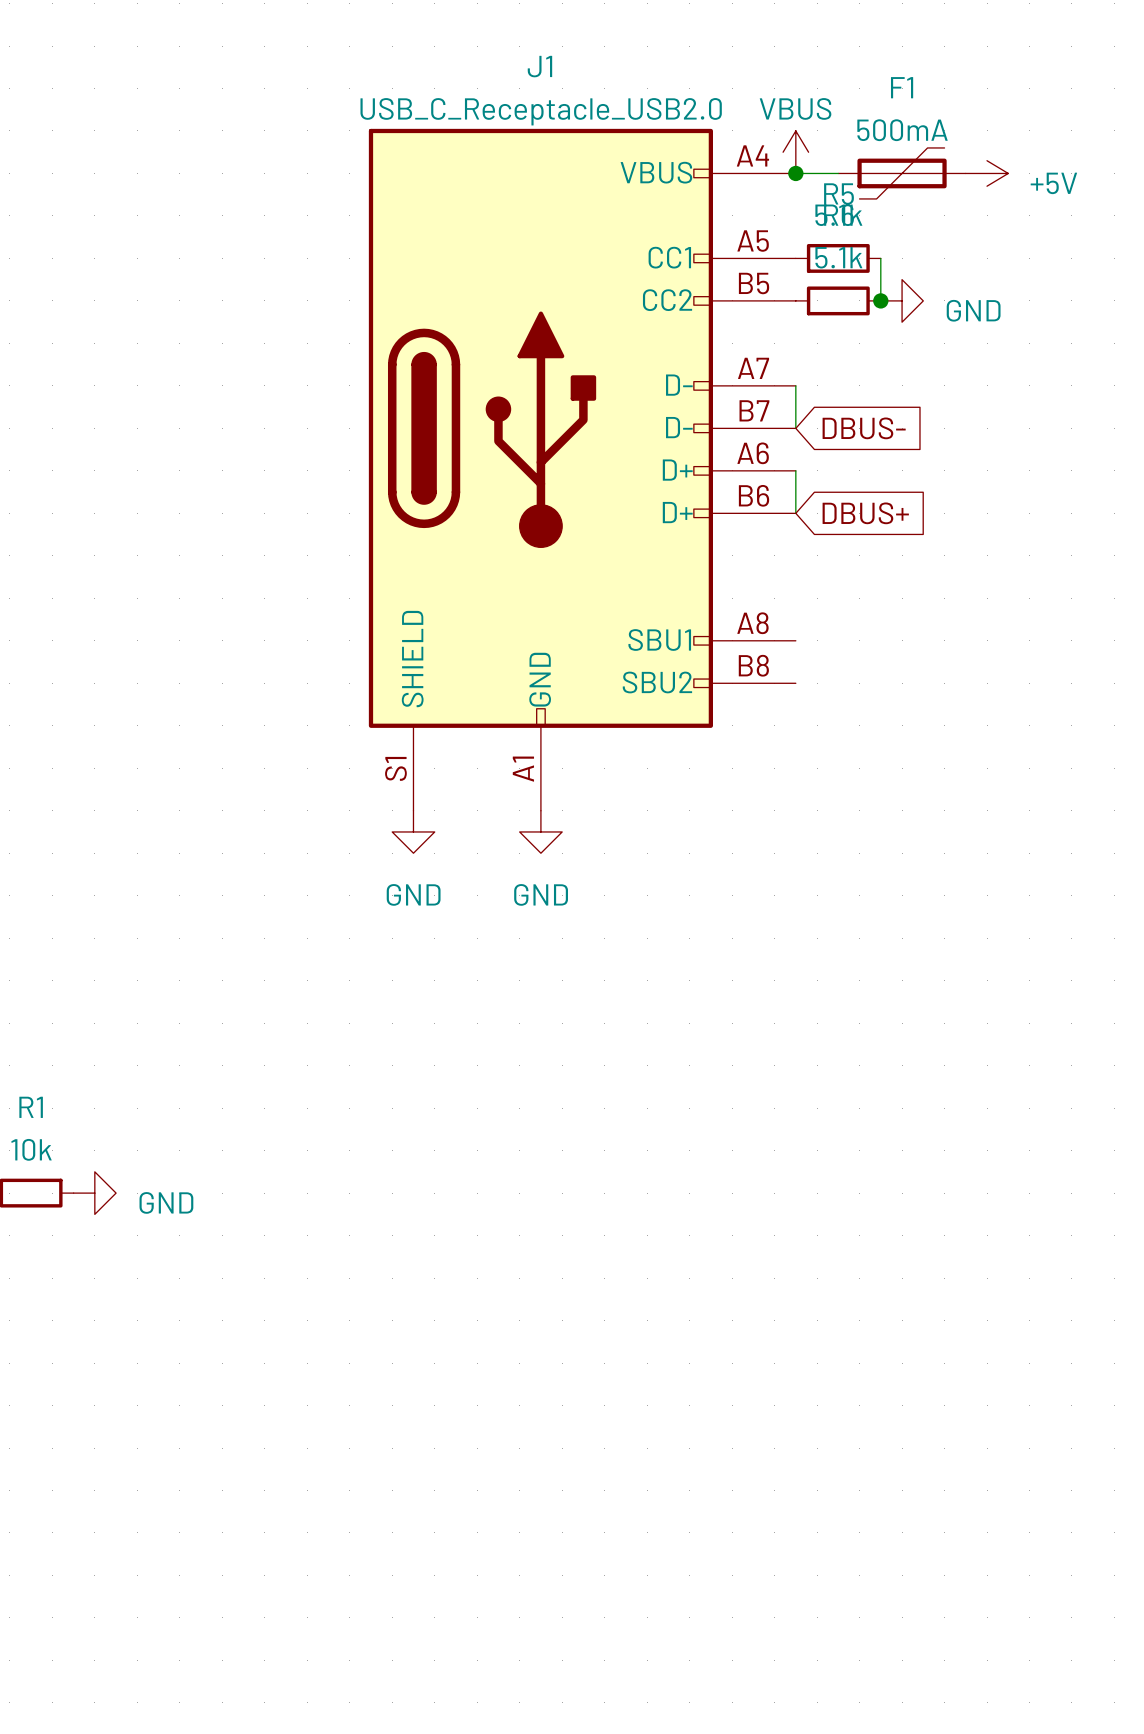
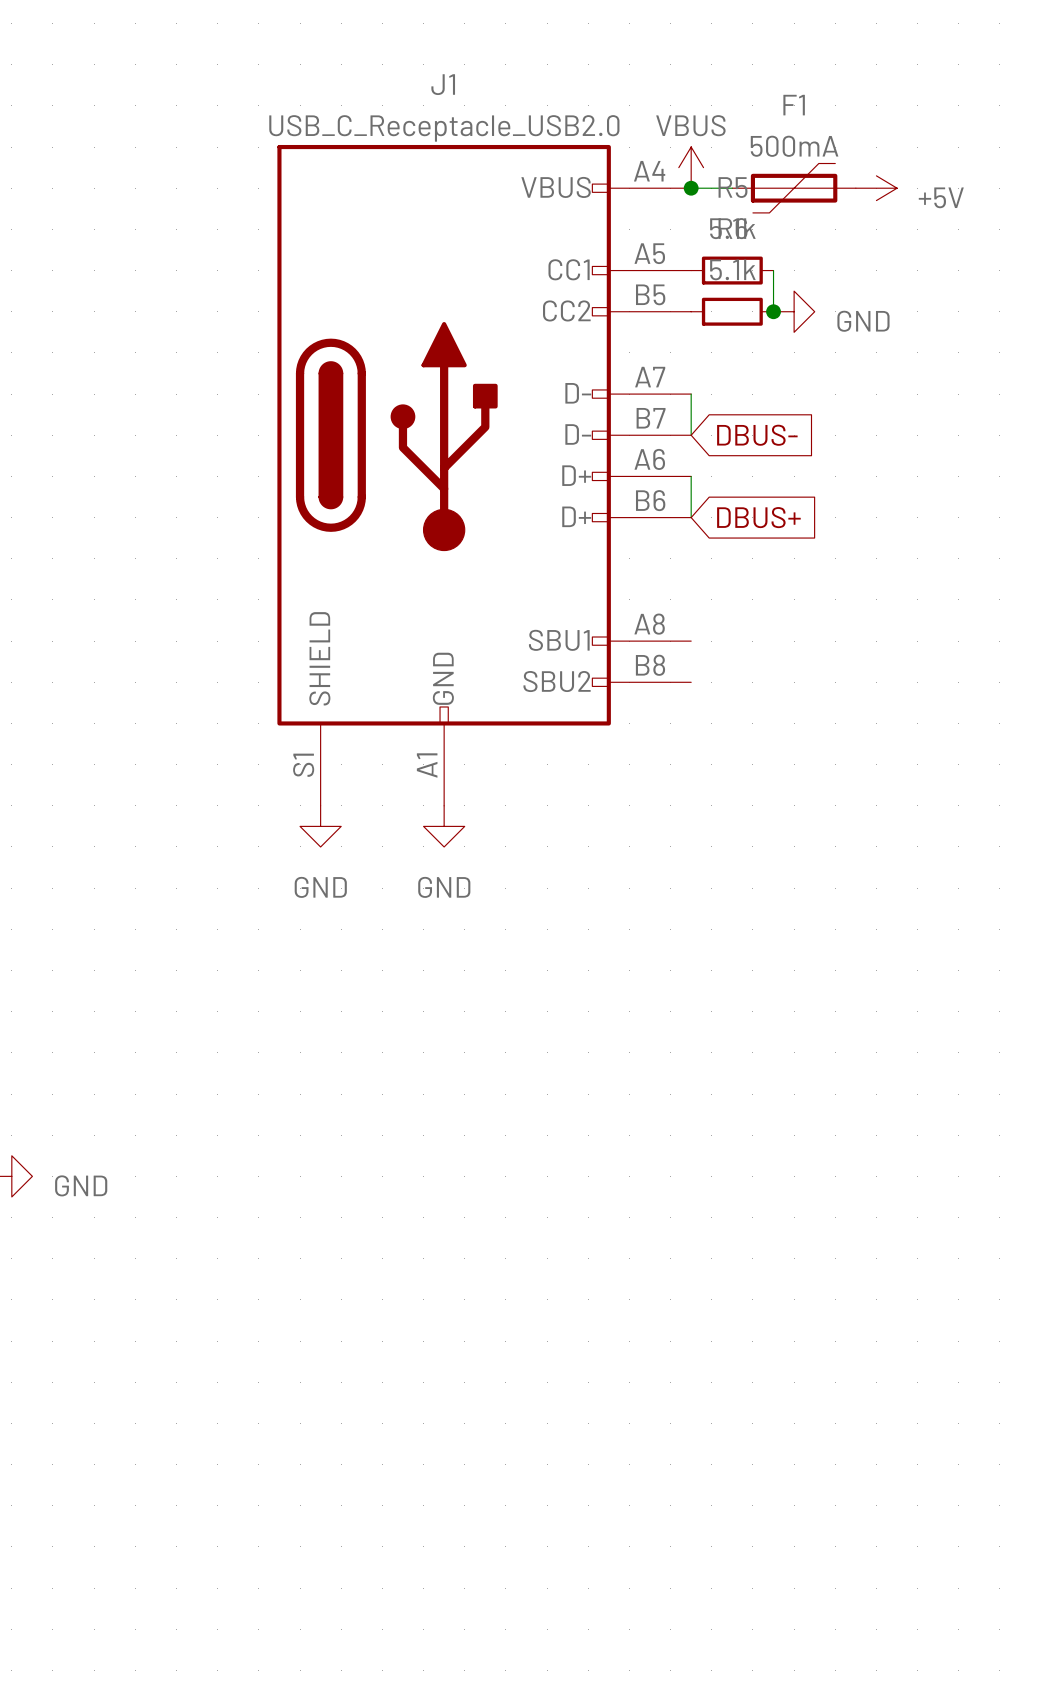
R5 name position: R5 (838, 194) -> R5 (733, 187)

